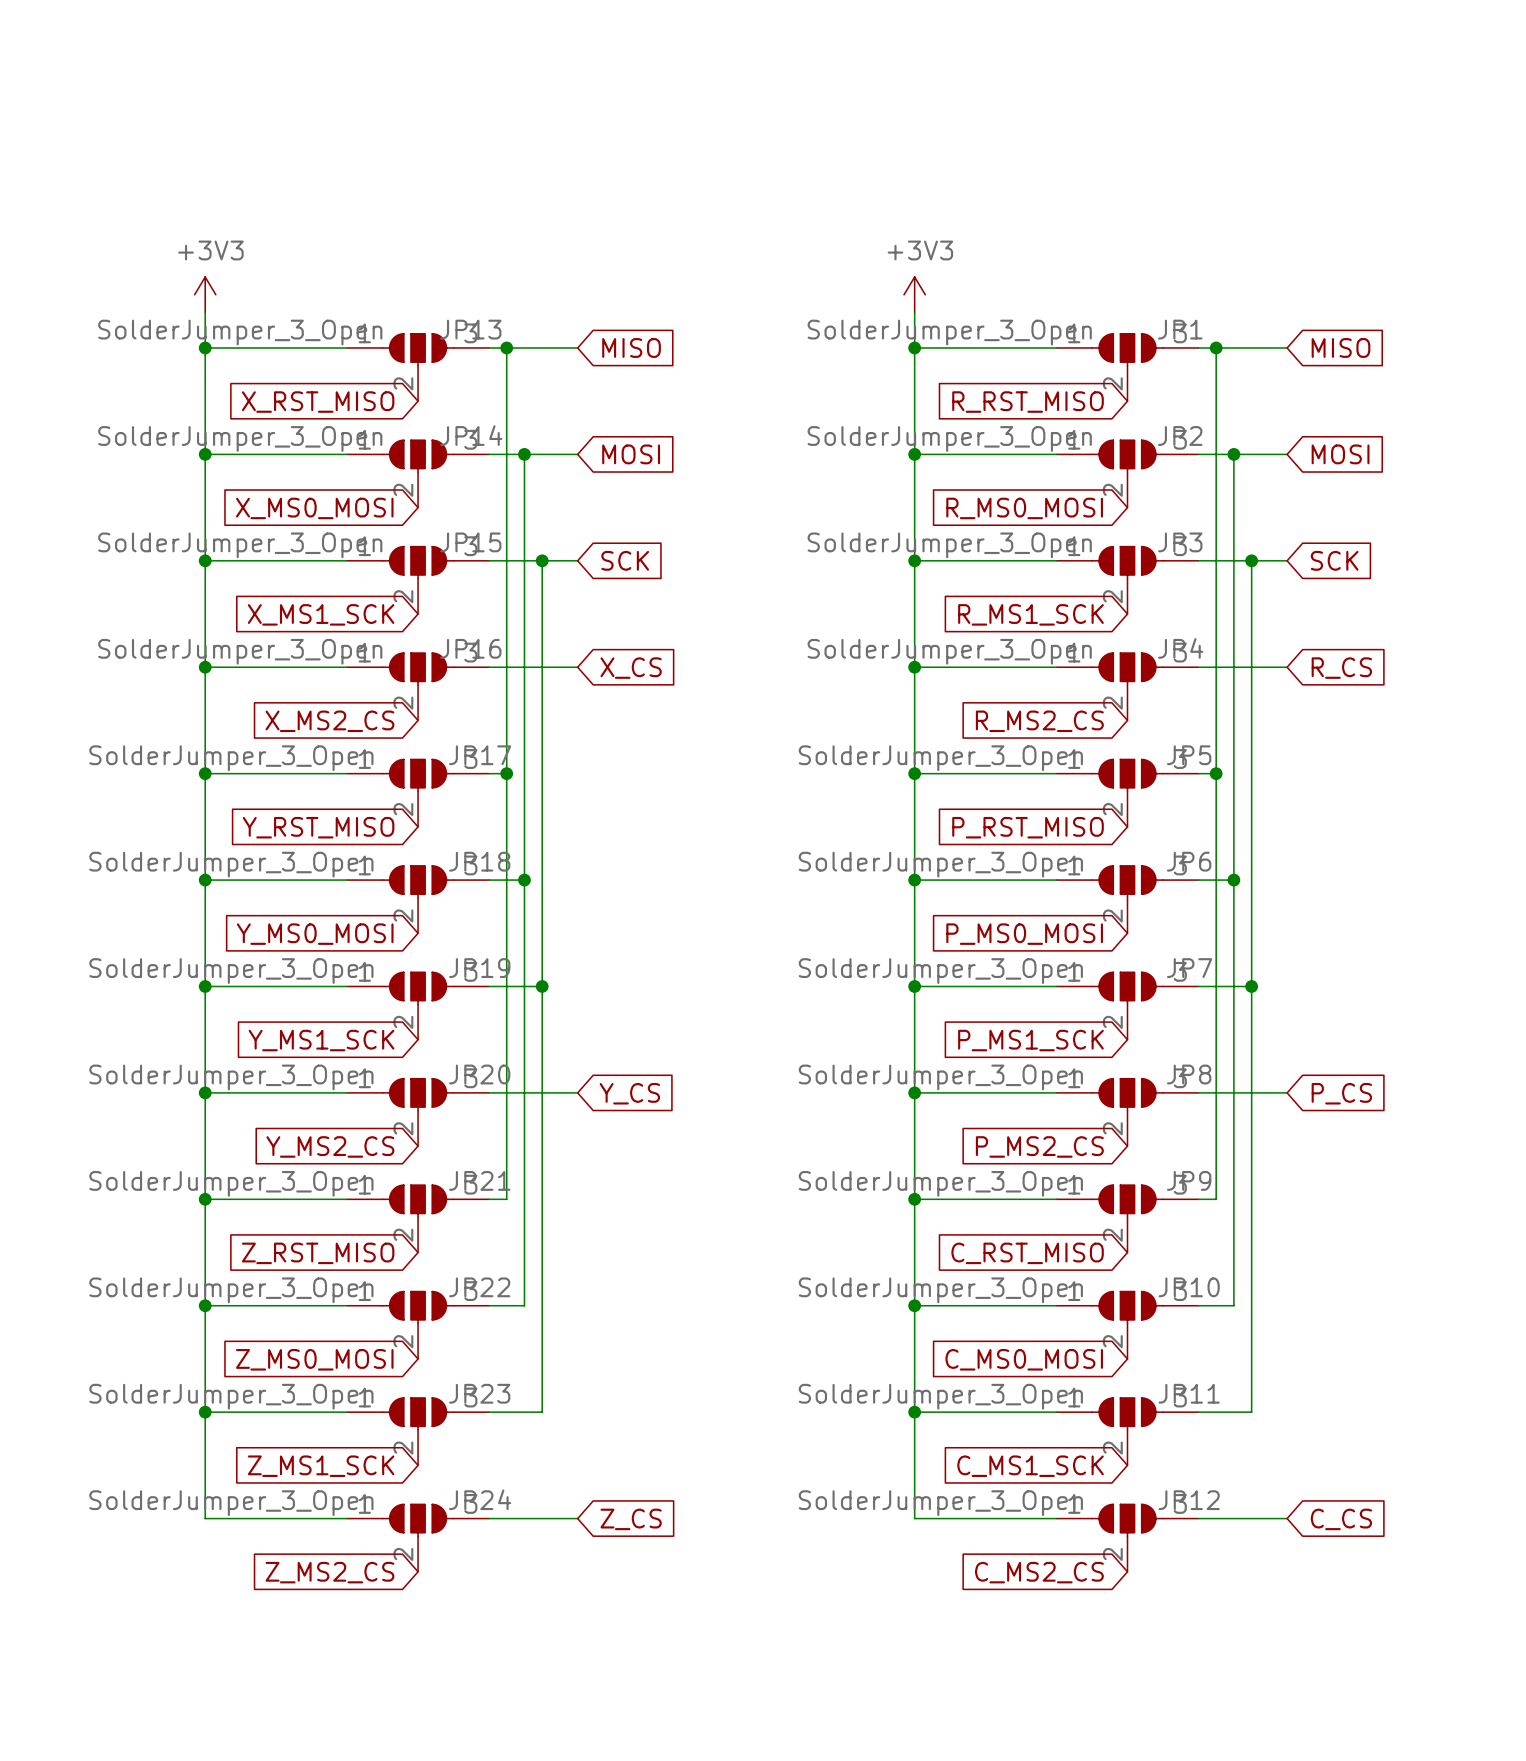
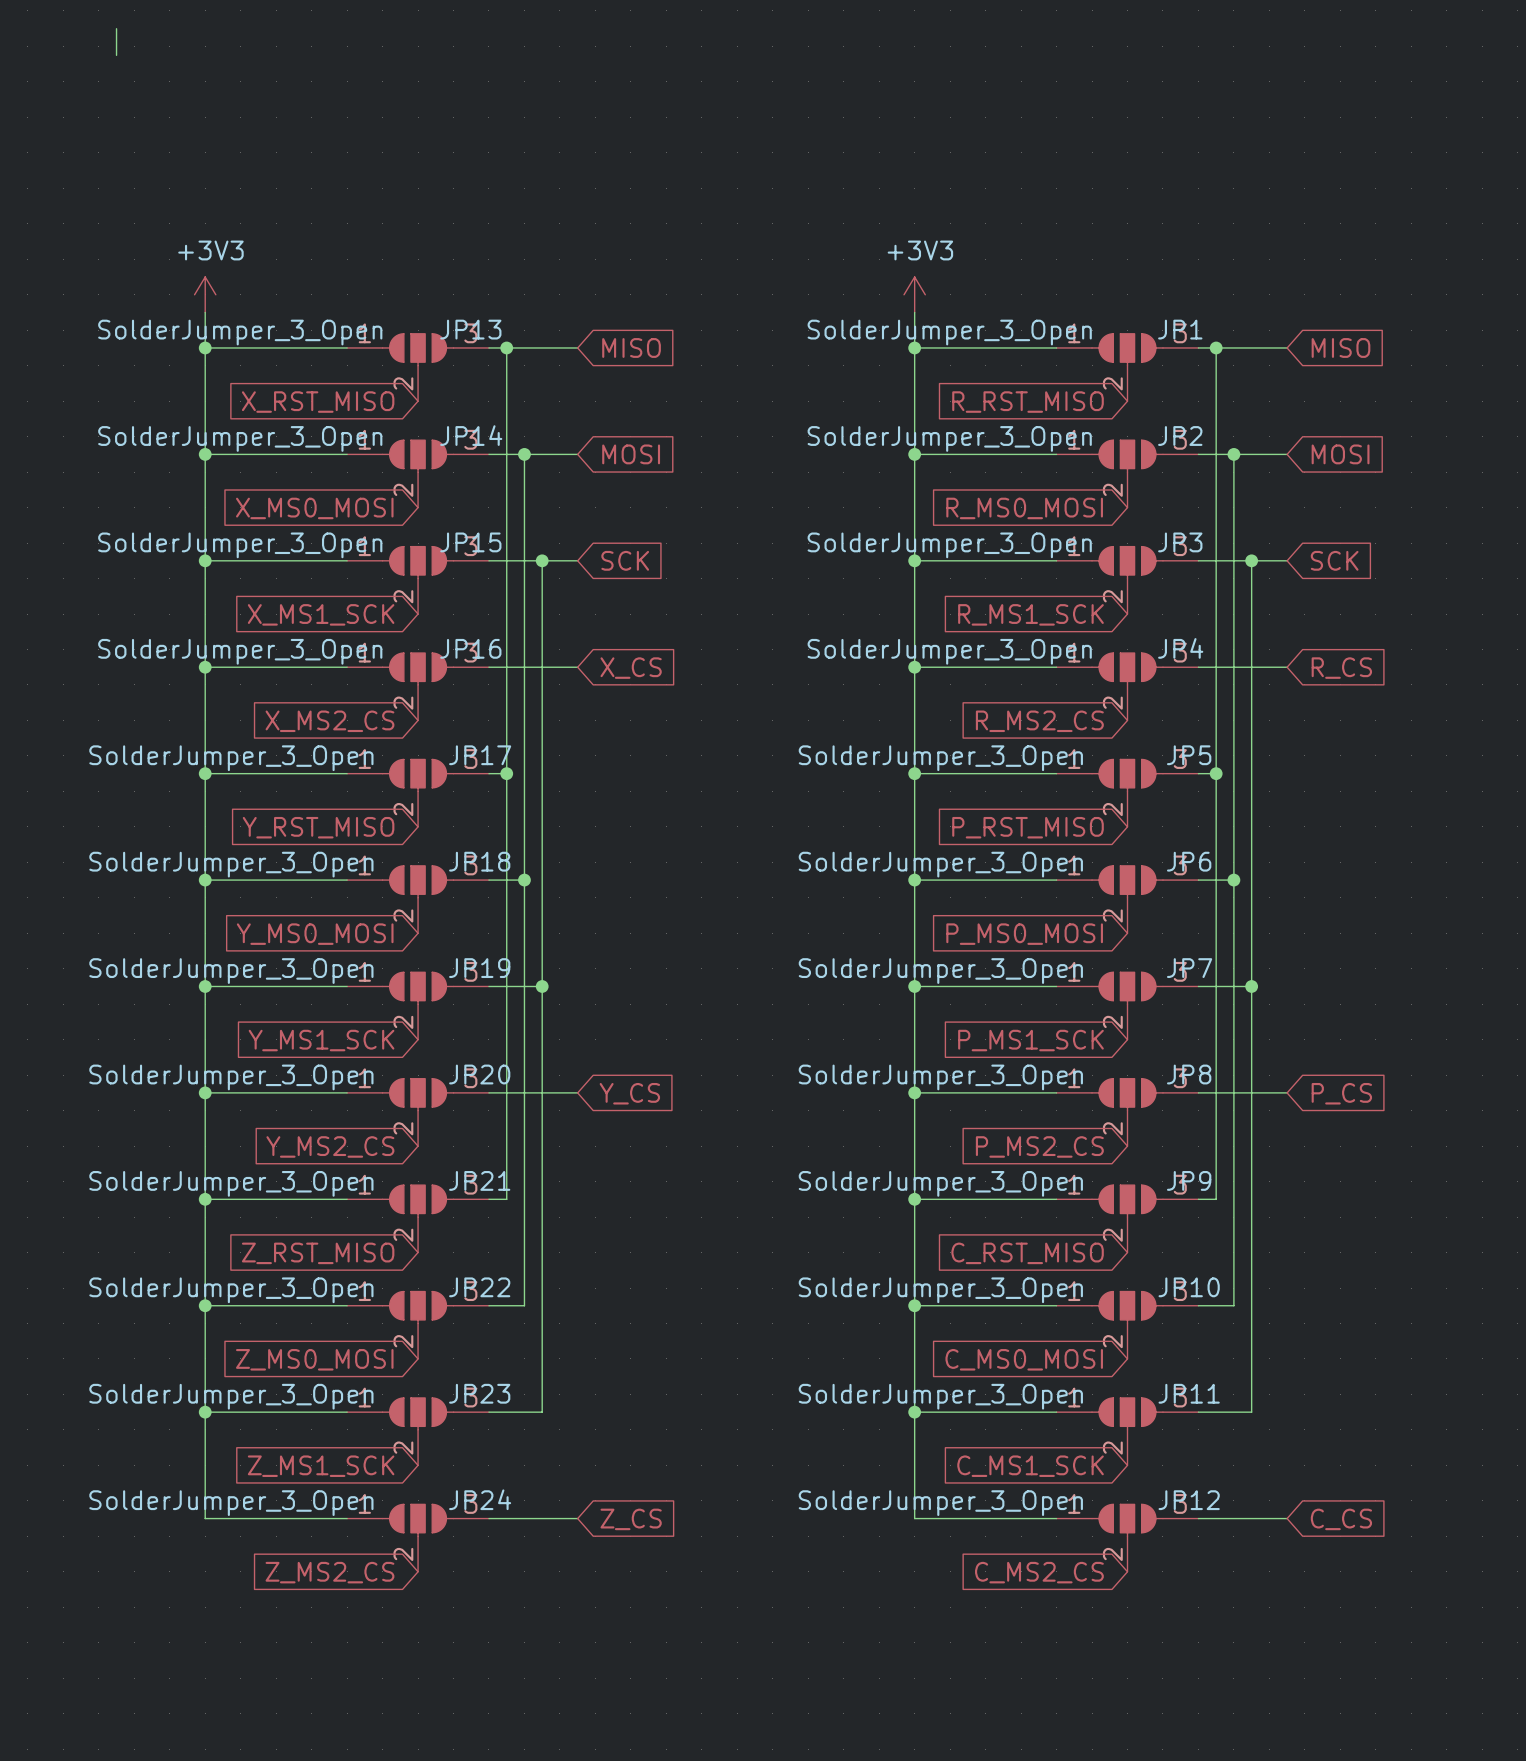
wire: none -> (116, 28) (116, 55)

